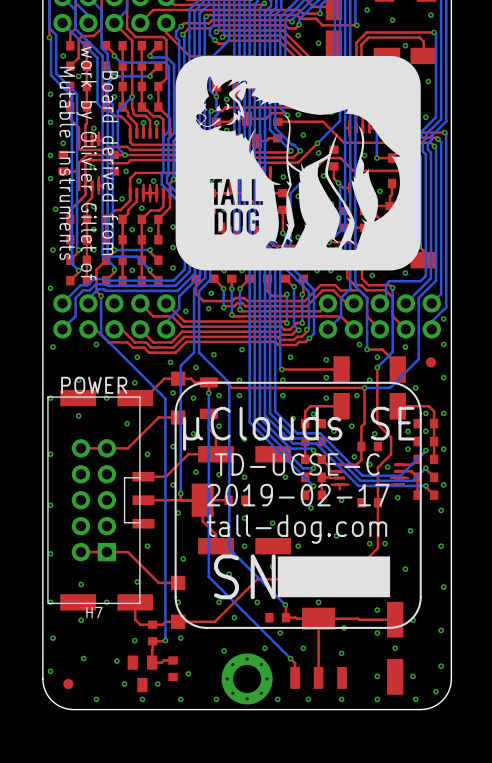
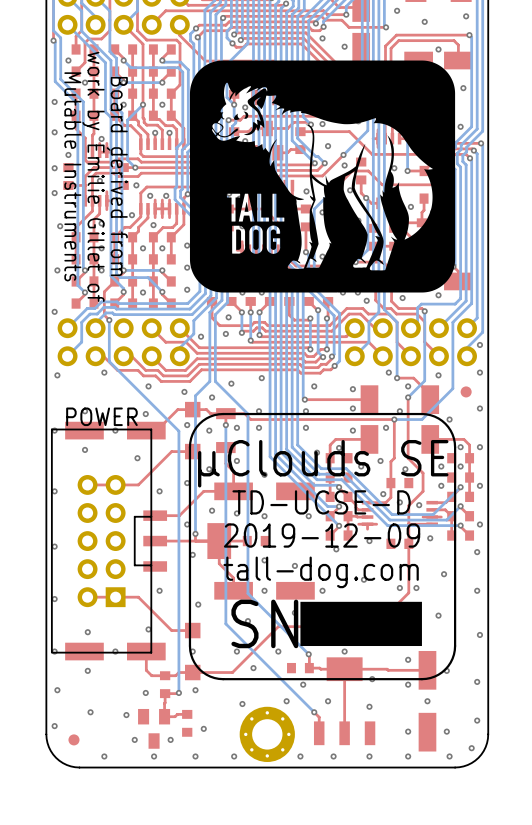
text: work by Olivier Gillet of (86, 163) -> work by Émilie Gillet of (96, 176)
text: TD-UCSE-C (297, 464) -> TD-UCSE-D (321, 502)
text: 2019-02-17 (298, 495) -> 2019-12-09 (322, 535)
H7 name: H7 (94, 612) -> none

